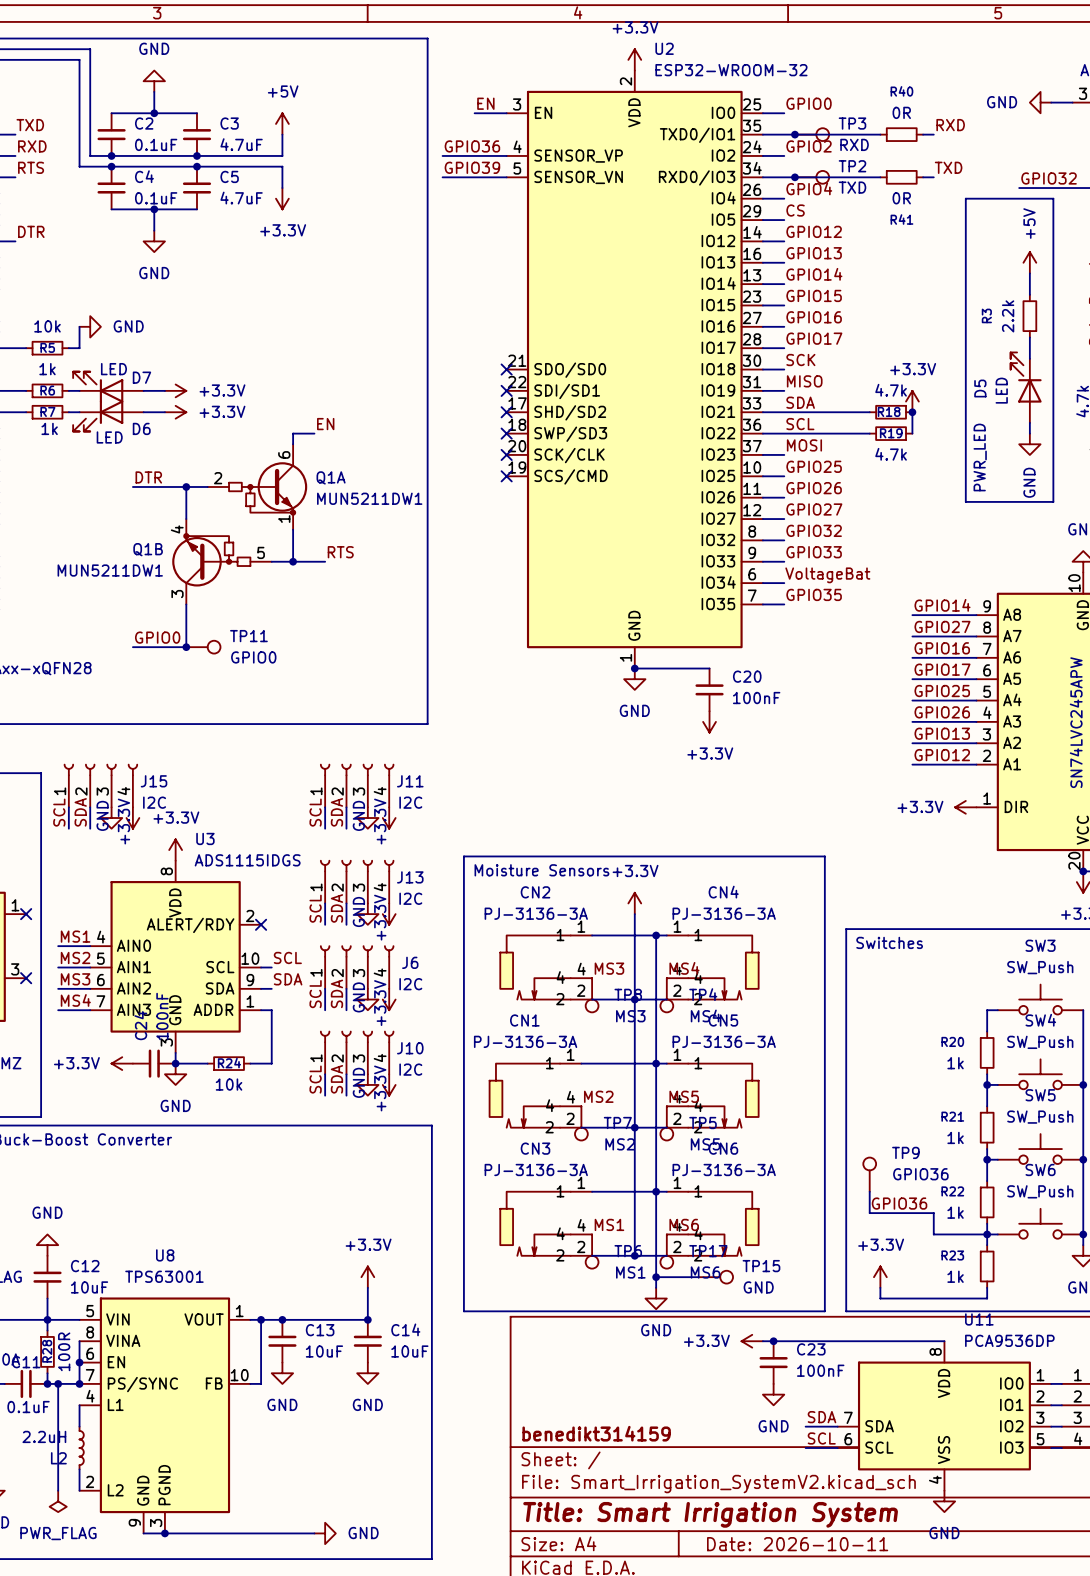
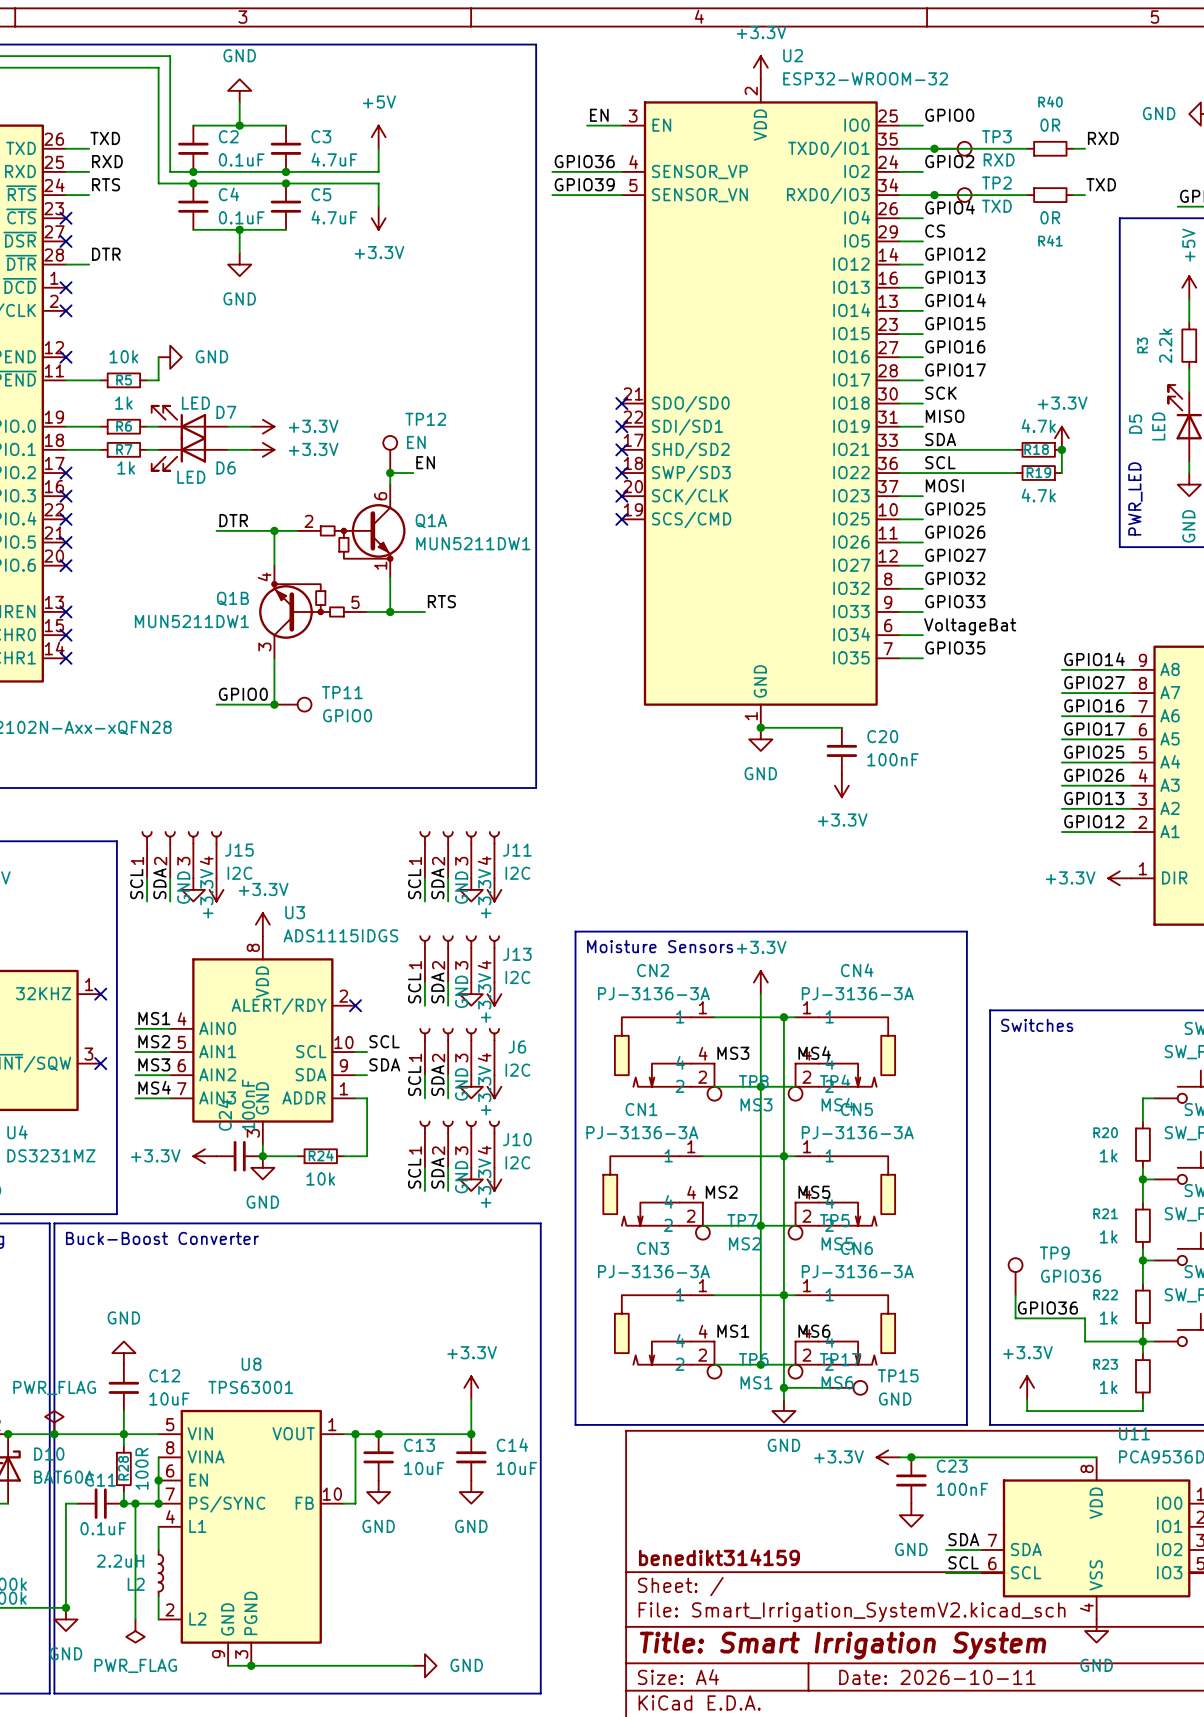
TP12: none -> EN (390, 454)
junction: none -> (390, 473)

